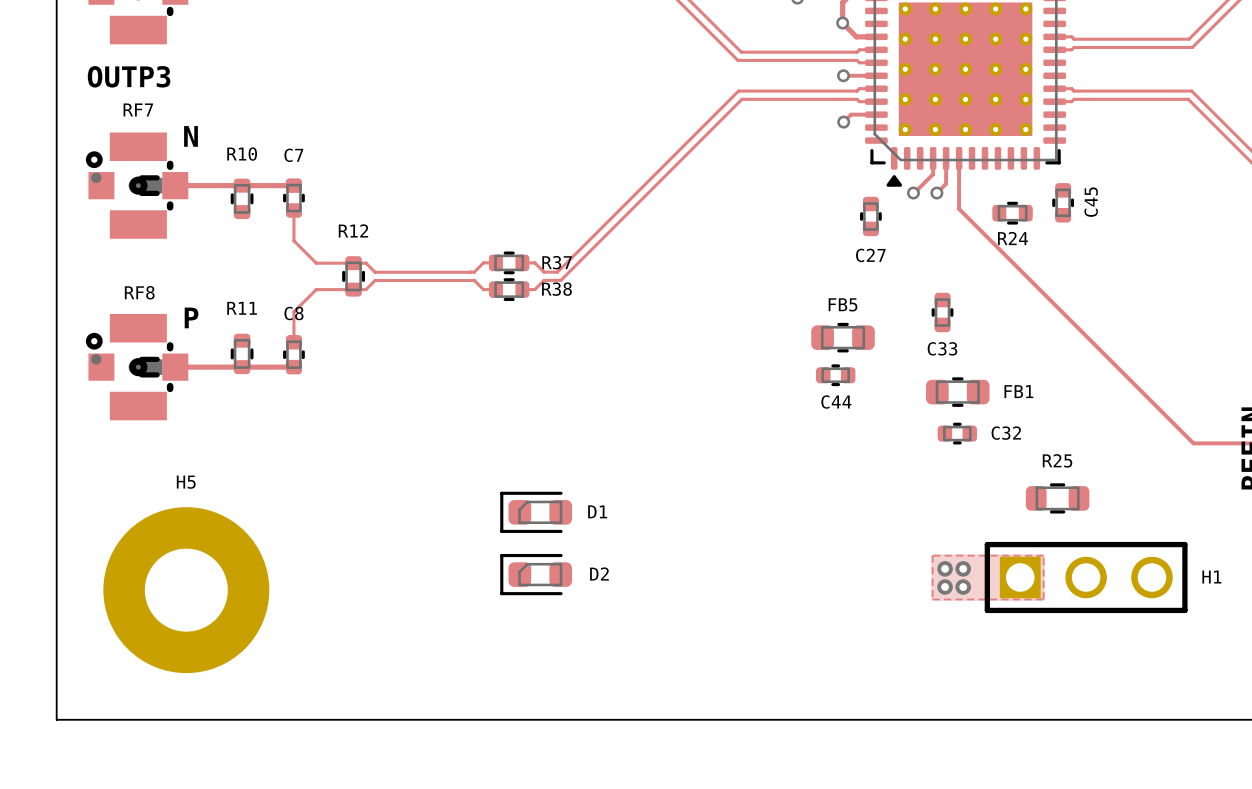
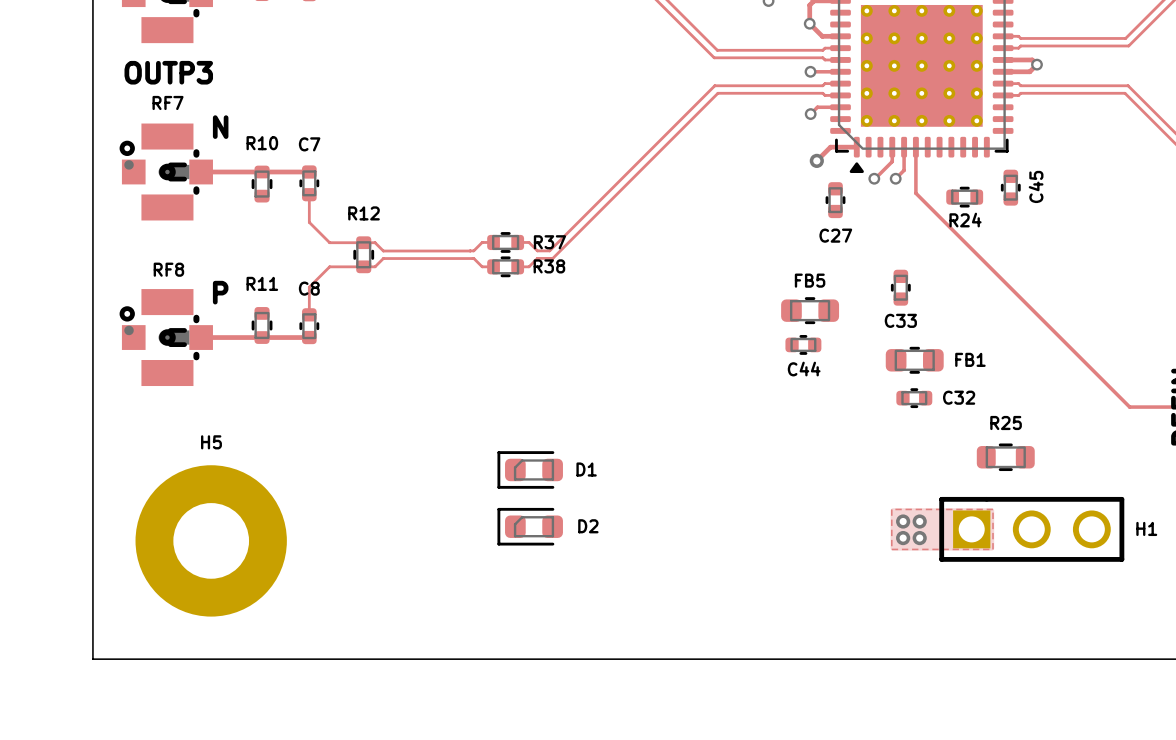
track: none -> (1003, 59) (1032, 59) (1036, 64) (1029, 71) (1003, 71)
via: none -> (1036, 64)
track: none -> (856, 147) (830, 147) (816, 160)
via: none -> (816, 160)

